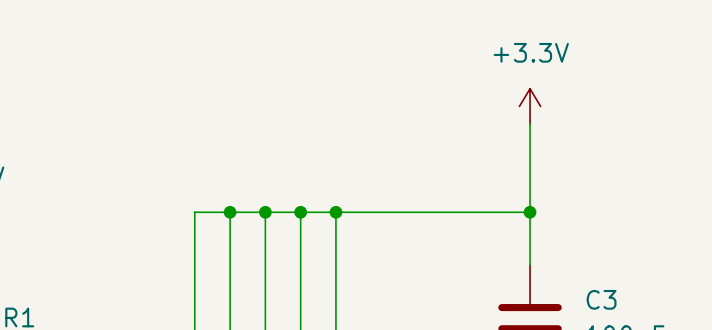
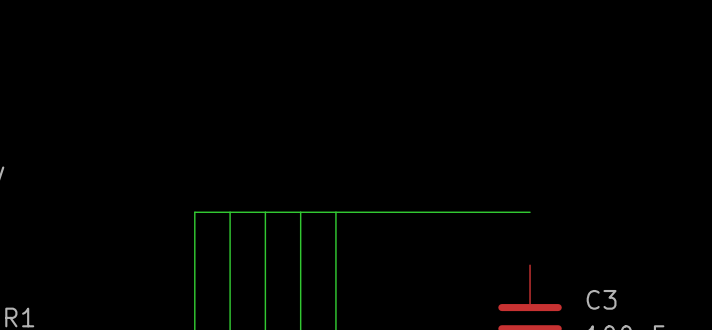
power symbol: +3.3V (530, 106) -> none
wire: (530, 124) (530, 265) -> none
junction: (230, 212) -> none
junction: (265, 212) -> none
junction: (300, 212) -> none
junction: (335, 212) -> none
junction: (530, 212) -> none

